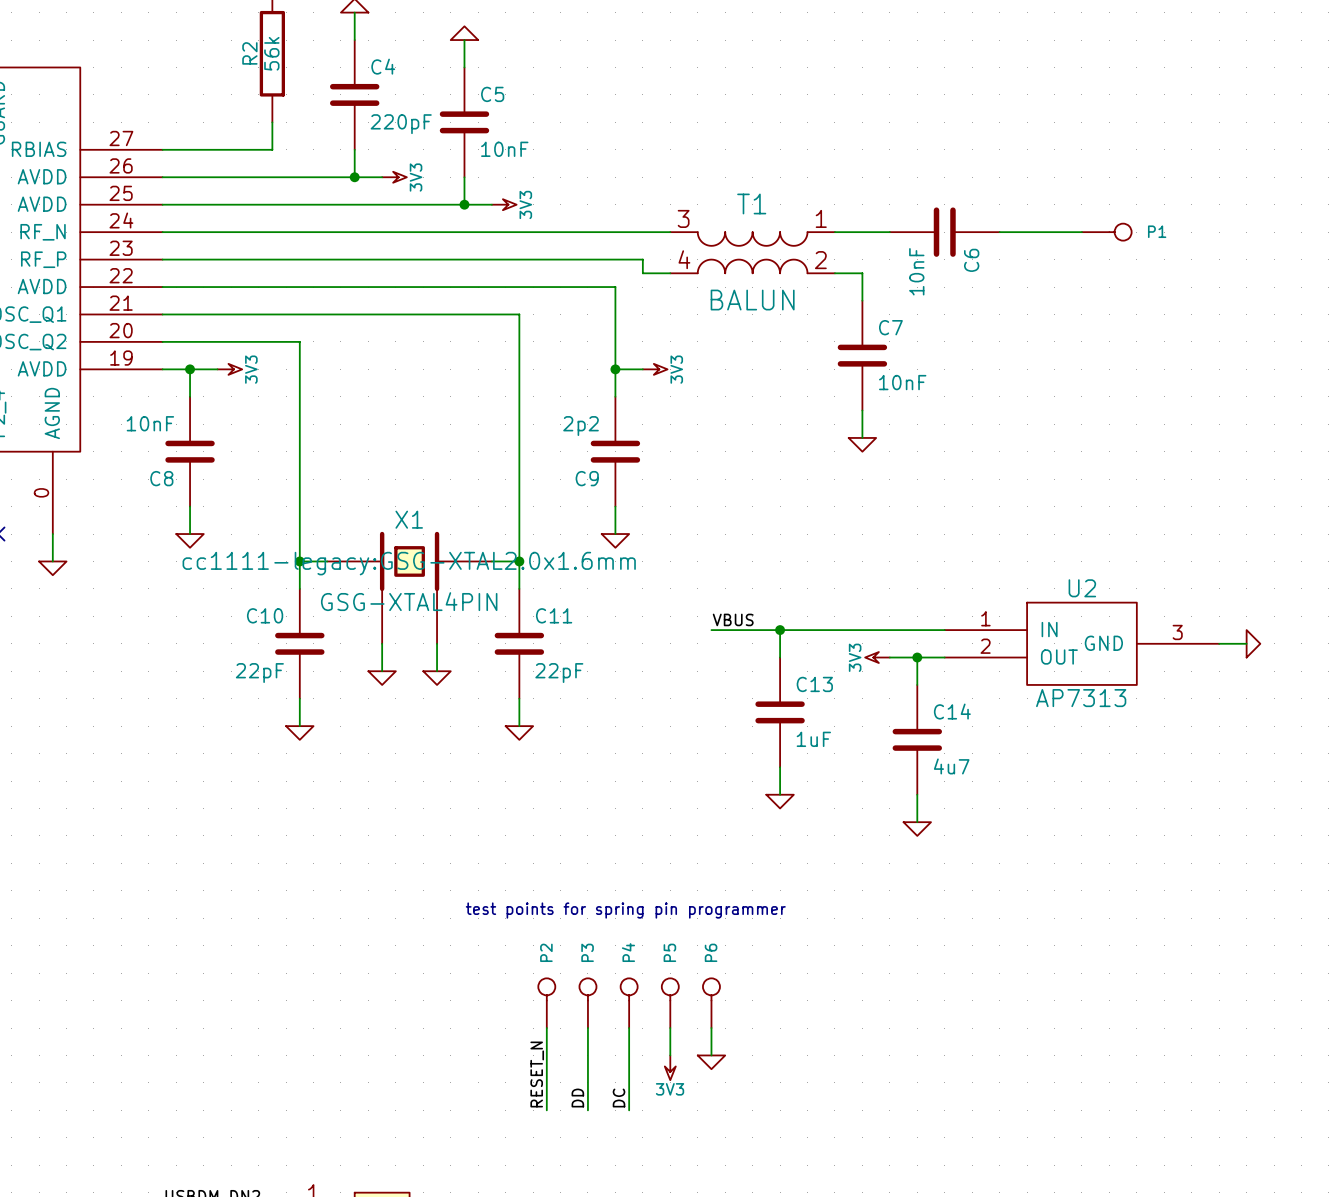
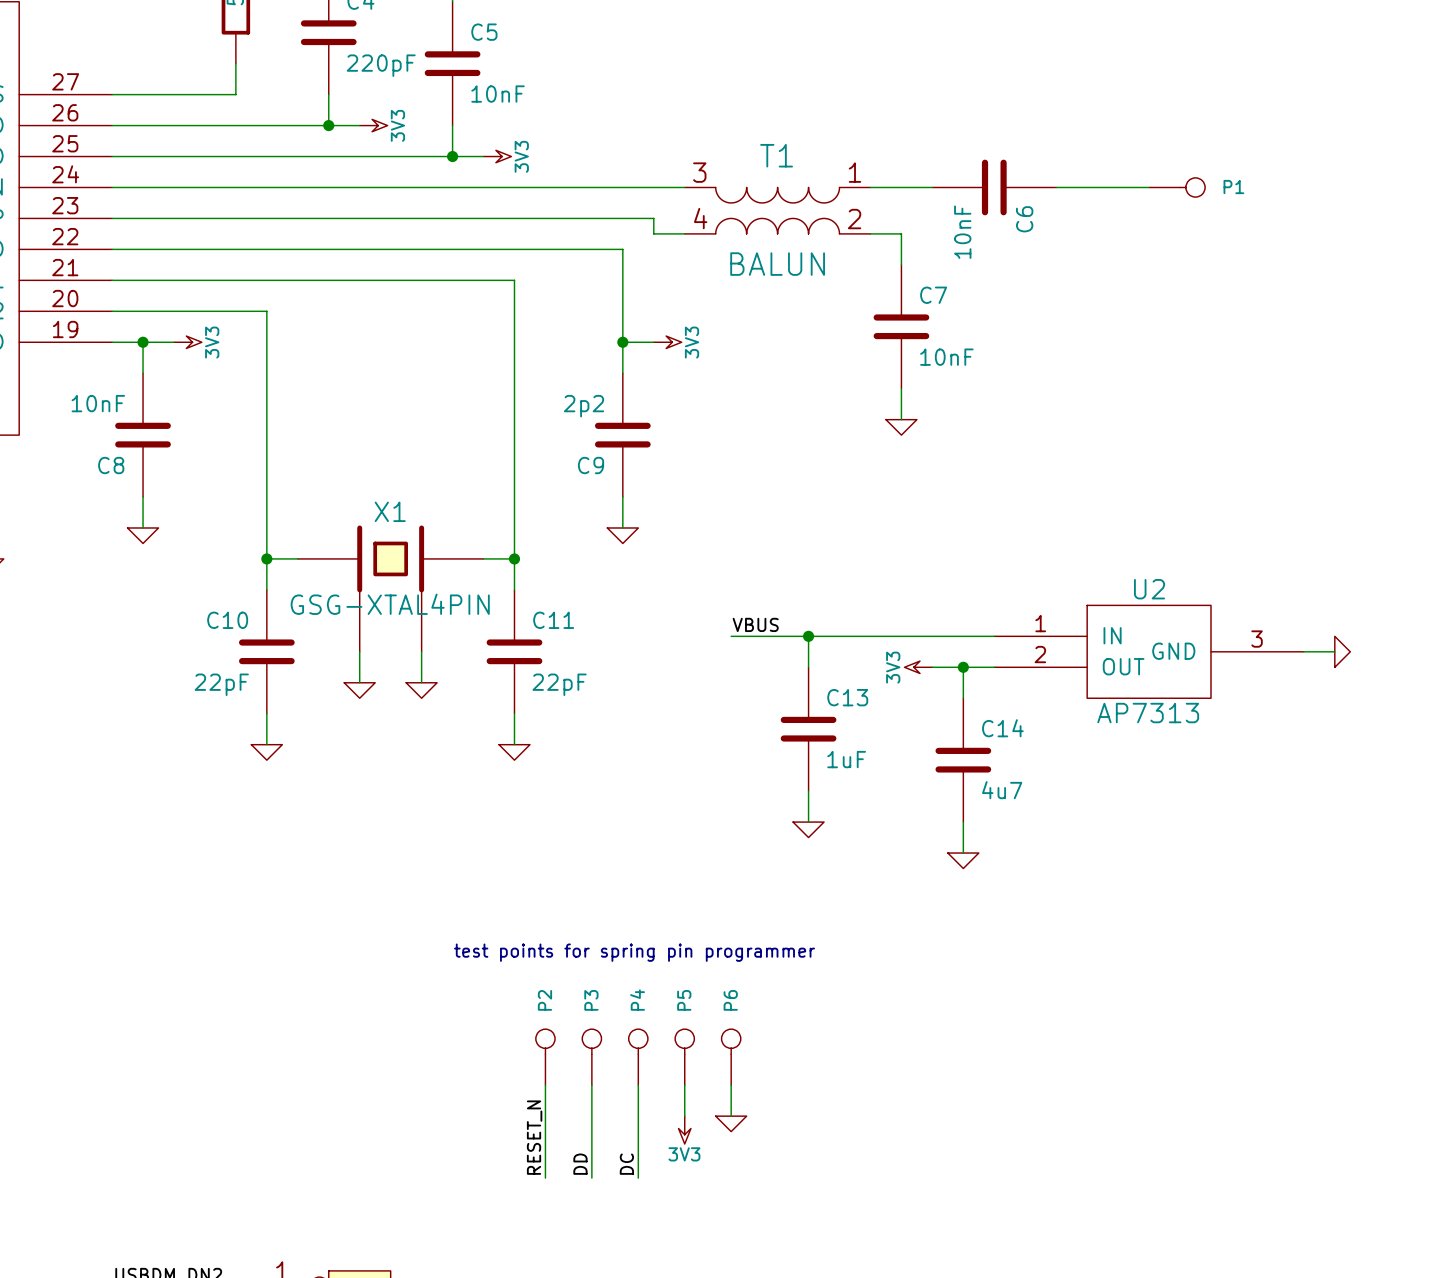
X1 text: cc1111-legacy:GSG-XTAL2.0x1.6mm (409, 563) -> none

